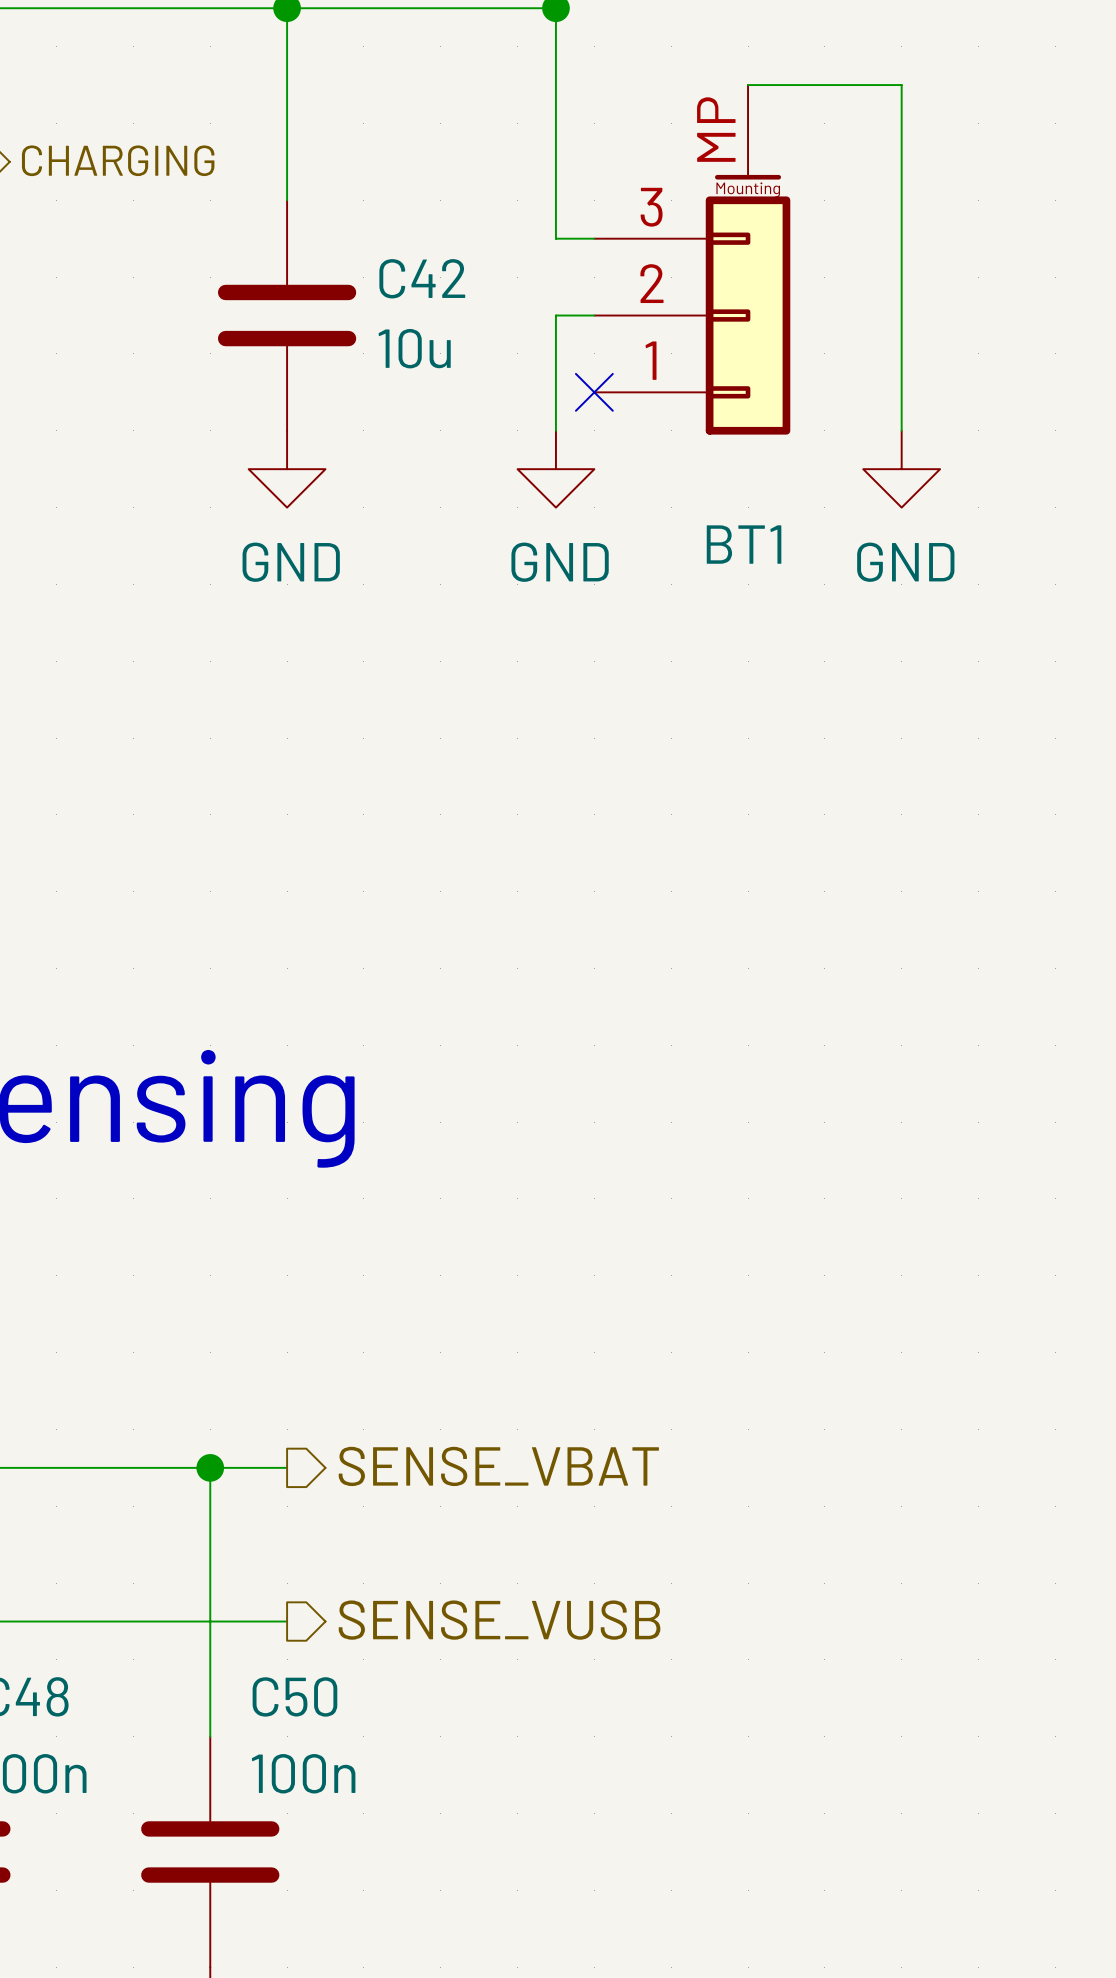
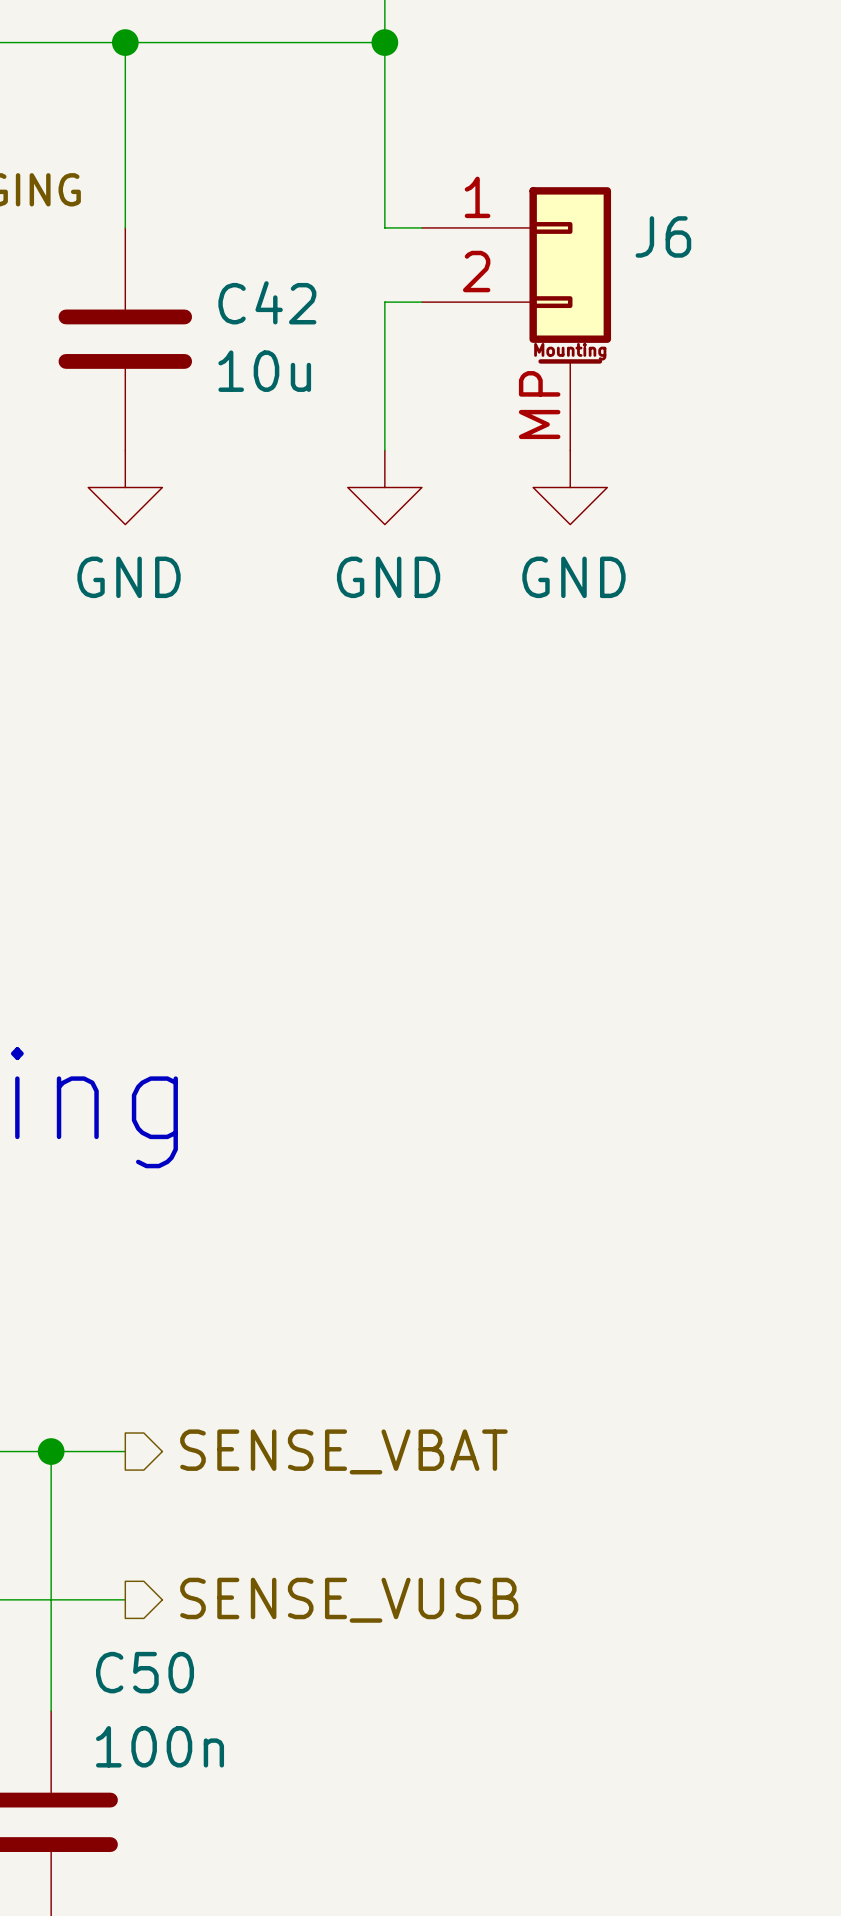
wire: (748, 85) (901, 85) (901, 430) -> none
wire: (555, 200) (555, 238) (594, 238) -> (384, 227) (421, 227)
BT1: (692, 259) -> none
J6: none -> (516, 318)
wire: (555, 315) (594, 315) -> (384, 339) (384, 302) (421, 302)
no-connect mark: (594, 392) -> none
power symbol position: GND (901, 469) -> GND (570, 487)

